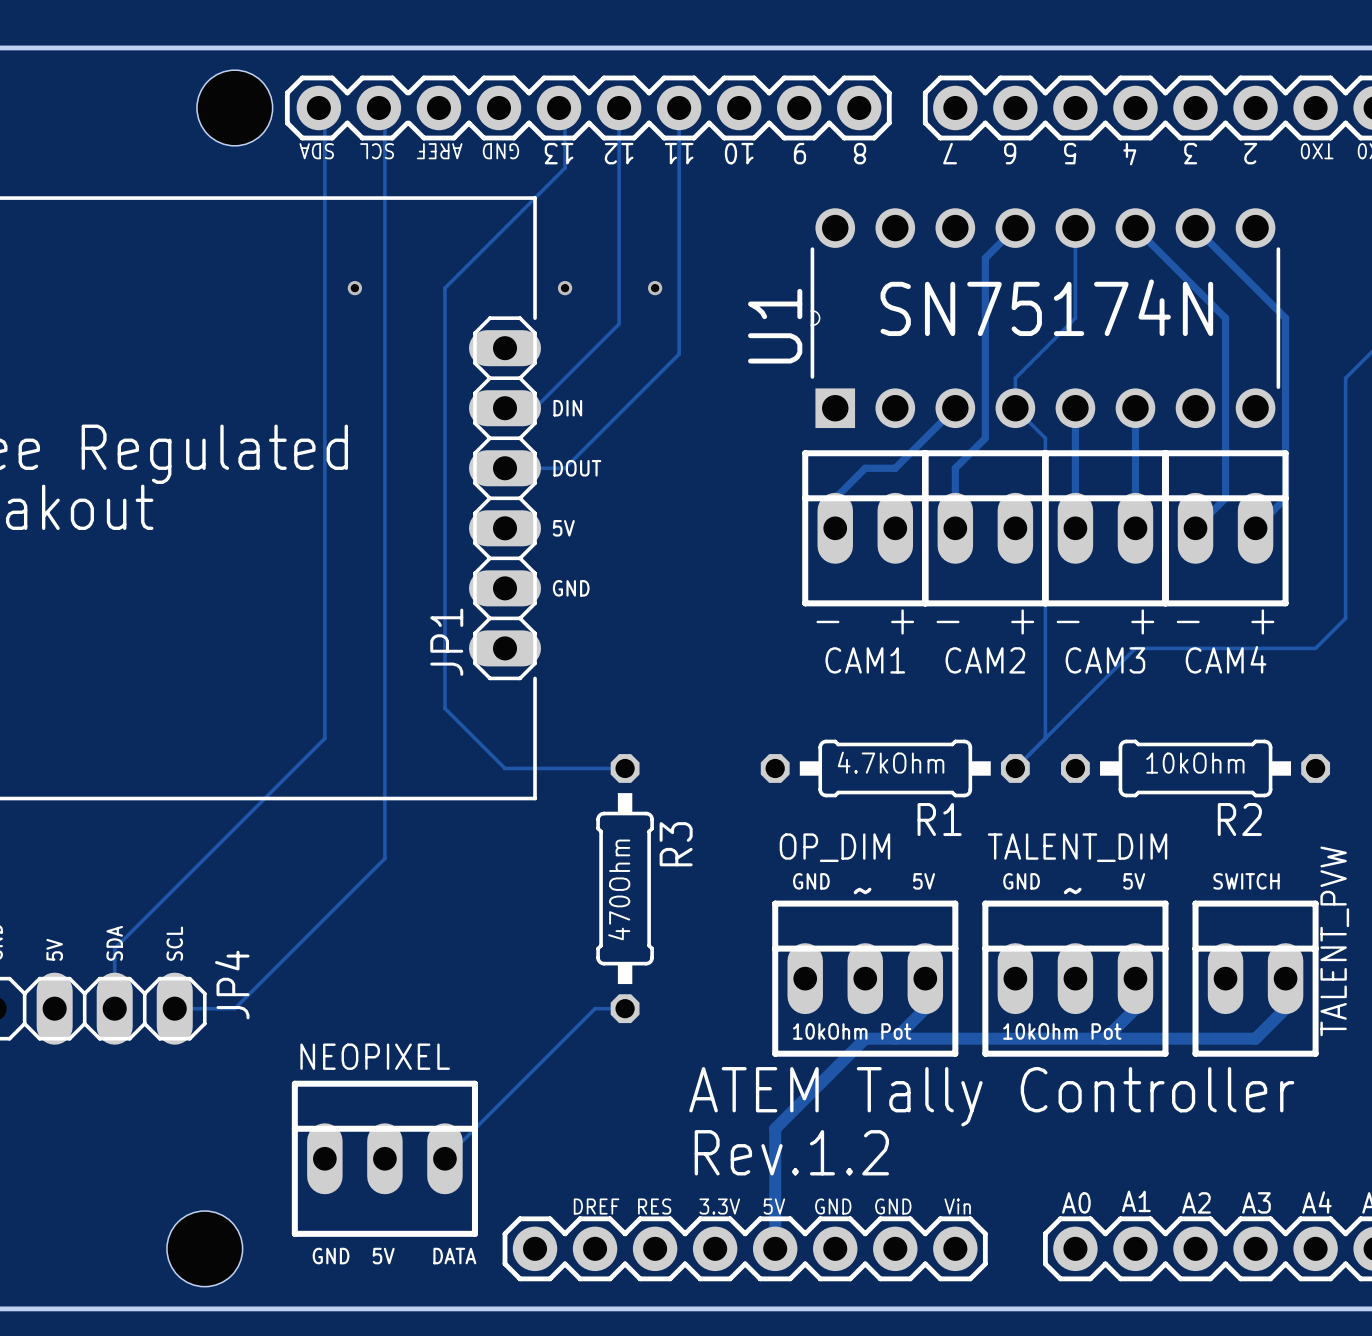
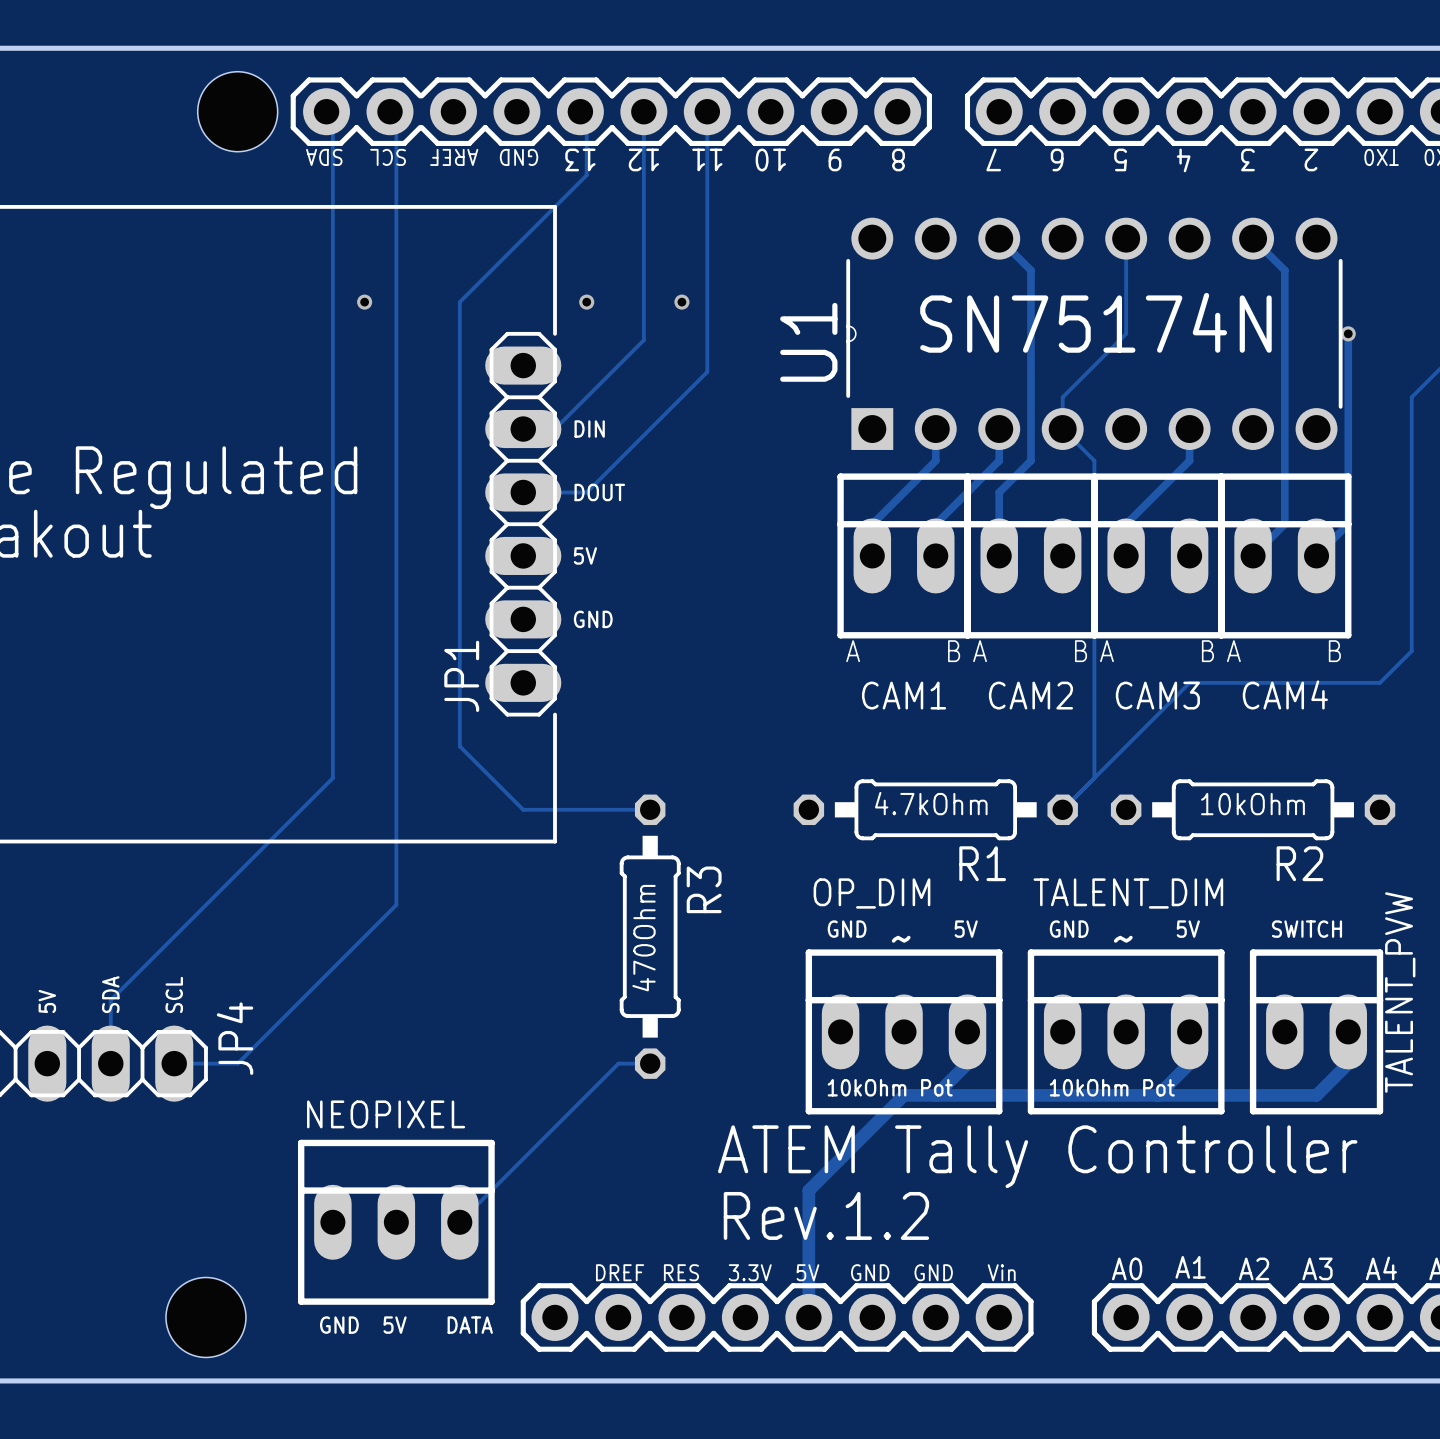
track: (1015, 228) (985, 258) -> (999, 238) (1030, 270)
track: (1135, 228) (1225, 318) -> none
track: (1225, 258) (1285, 318) -> (1284, 270) (1284, 333)
via: none -> (1348, 333)
track: (955, 408) (895, 468) (865, 468) -> (935, 429) (935, 460) (904, 492)
track: none -> (999, 429) (999, 460) (935, 524) (935, 555)
track: (1075, 408) (1075, 498) -> none
track: (1135, 438) (1135, 528) -> (1189, 460) (1126, 524)
text: - + (865, 621) -> A B (903, 651)
text: - + (985, 621) -> A B (1030, 651)
text: - + (1105, 621) -> A B (1157, 651)
text: - + (1225, 621) -> A B (1283, 651)

